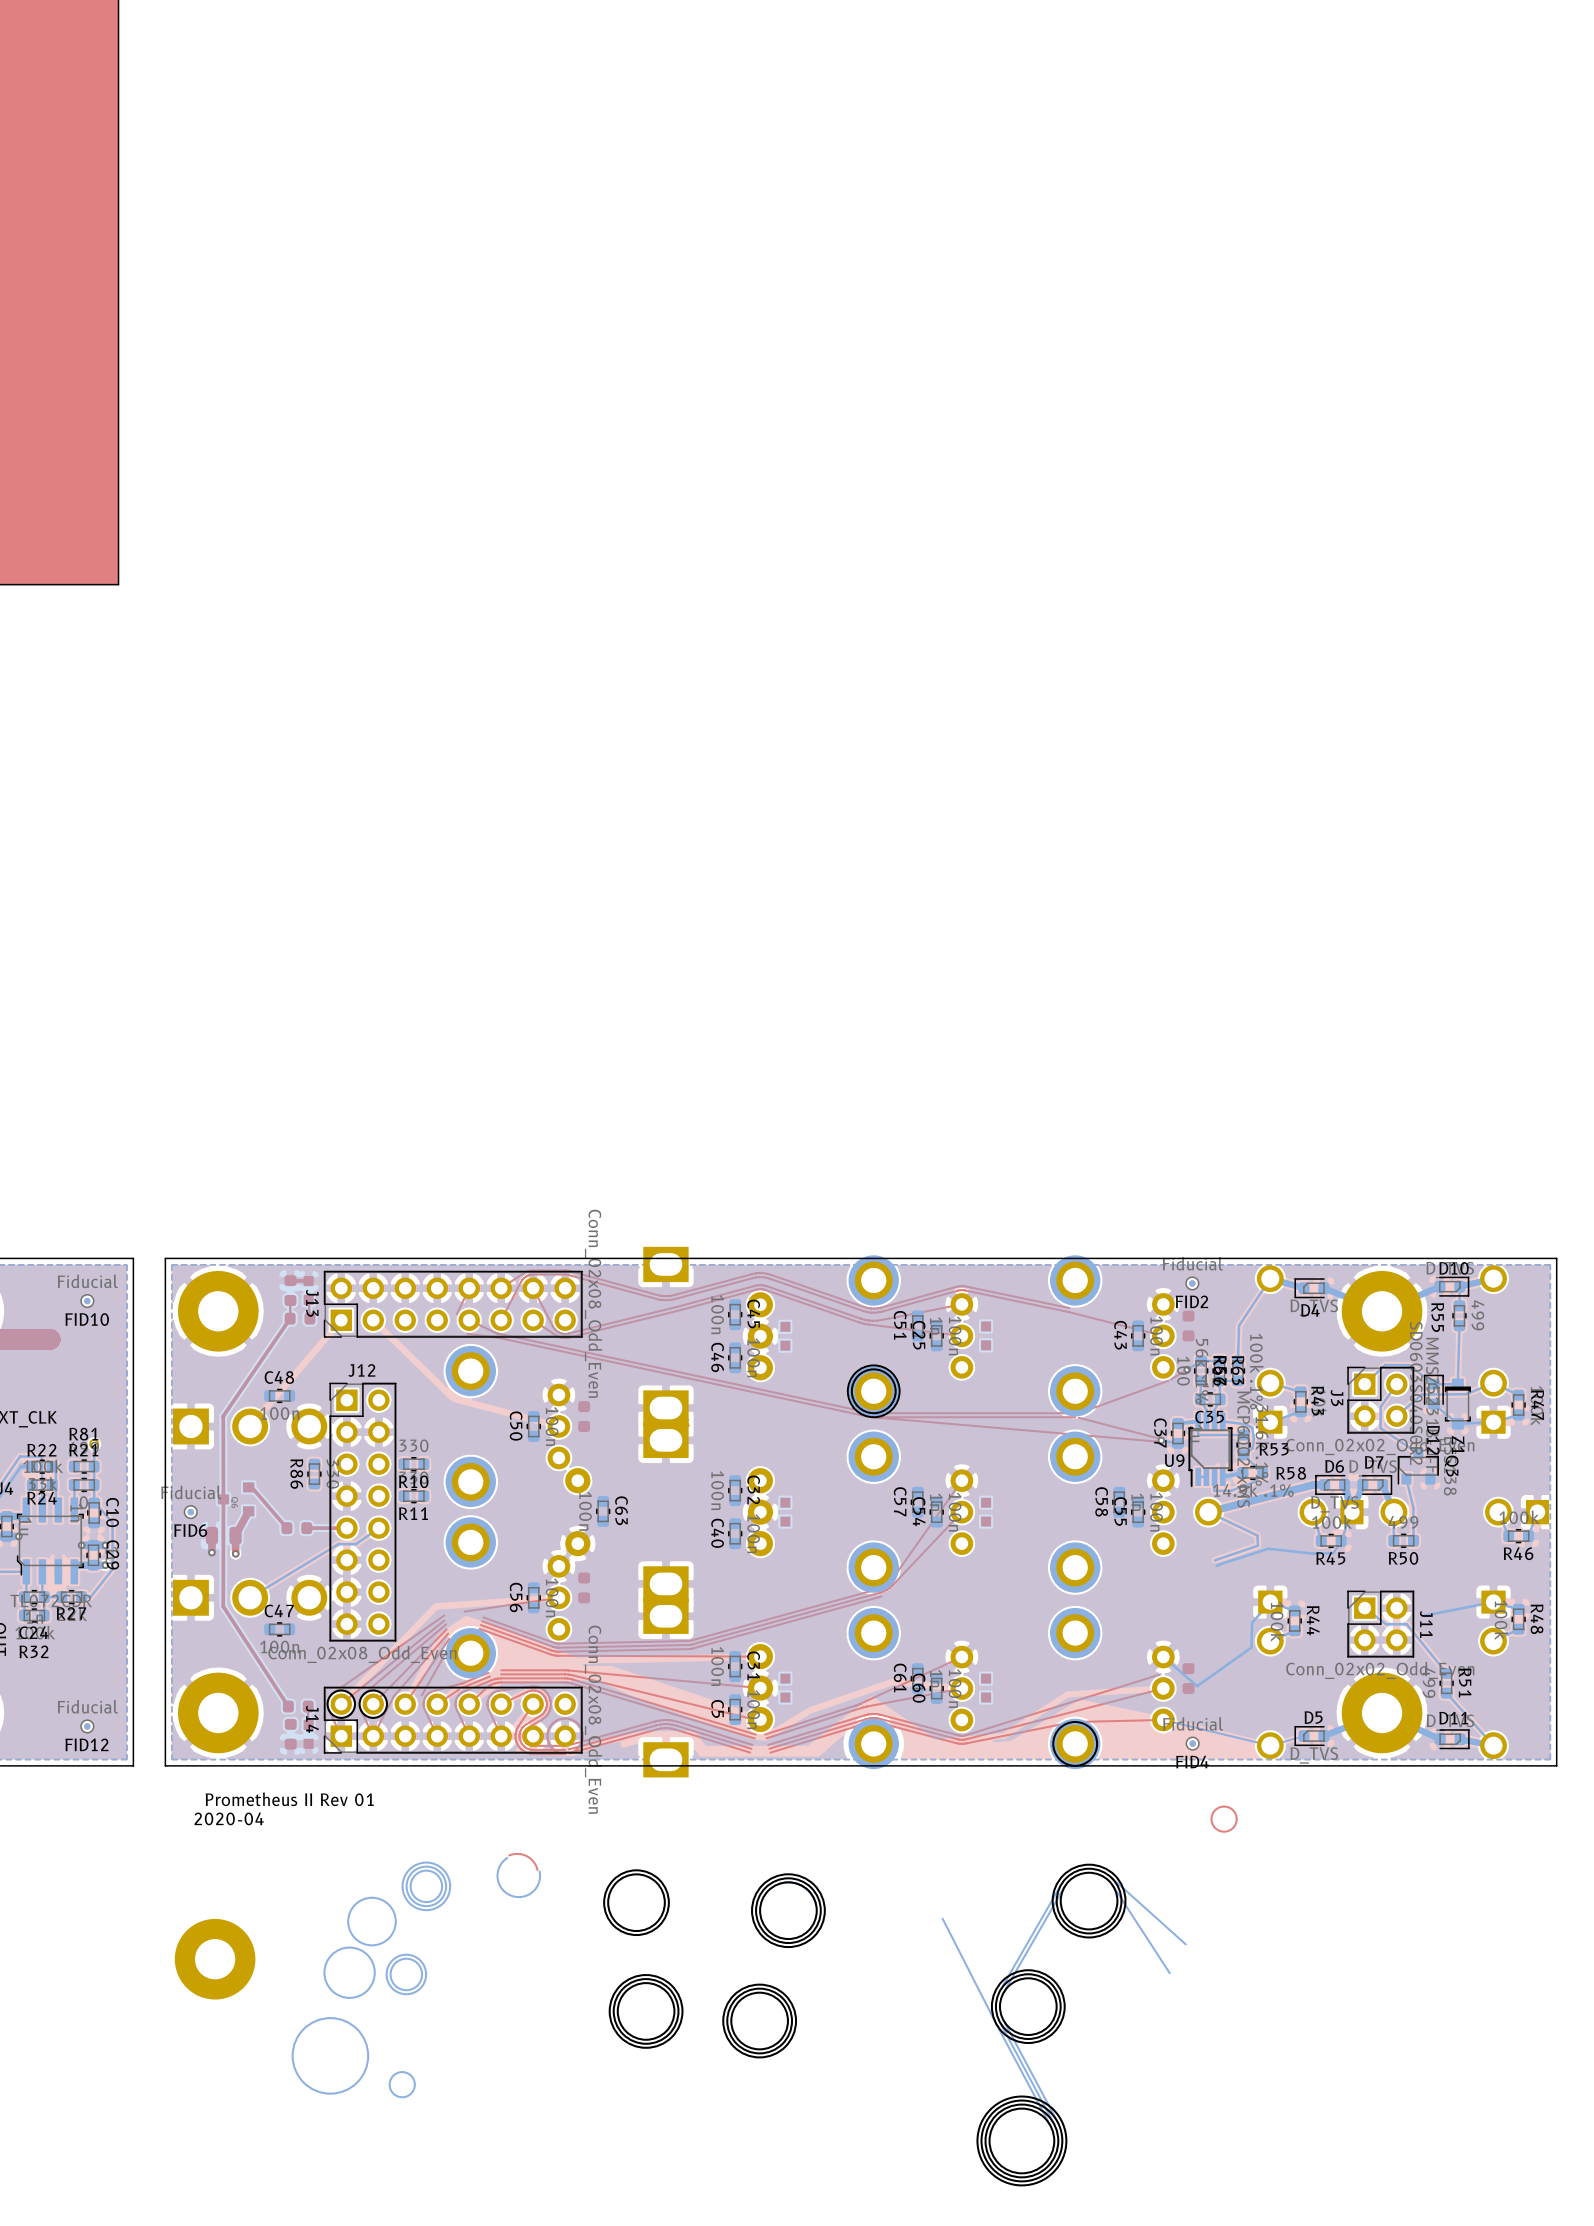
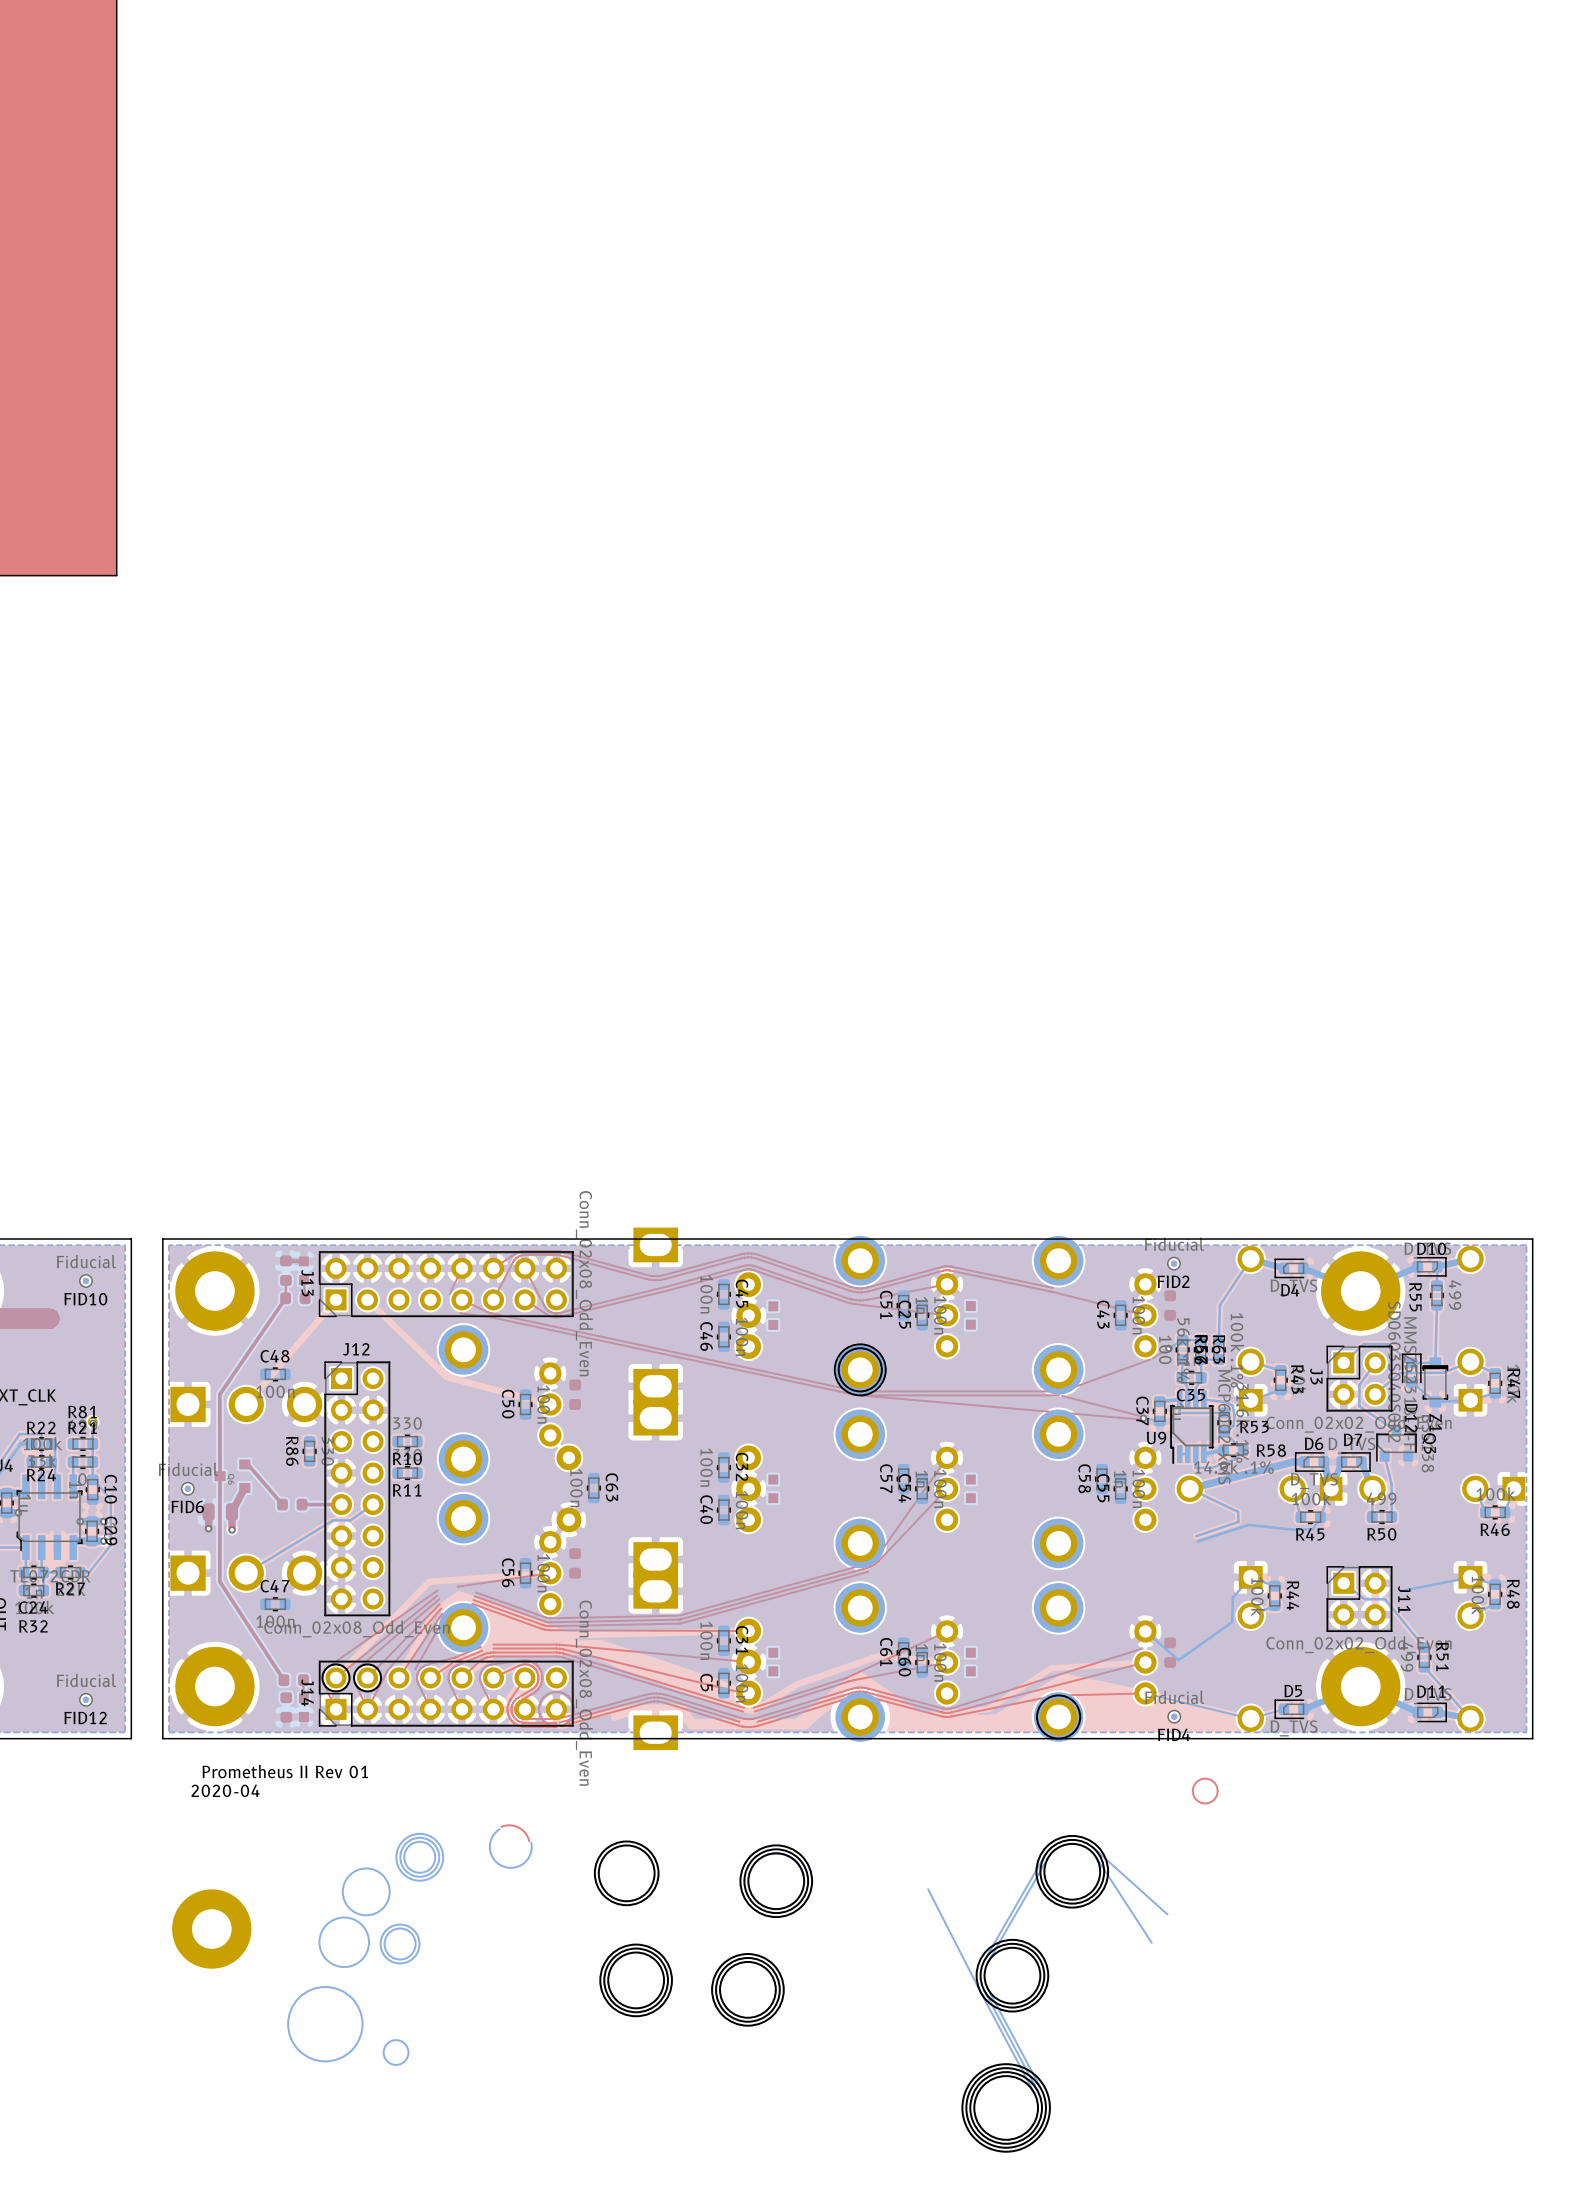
top track: none -> (756, 1718) (740, 1718)
top track: none -> (758, 1725) (738, 1725)

